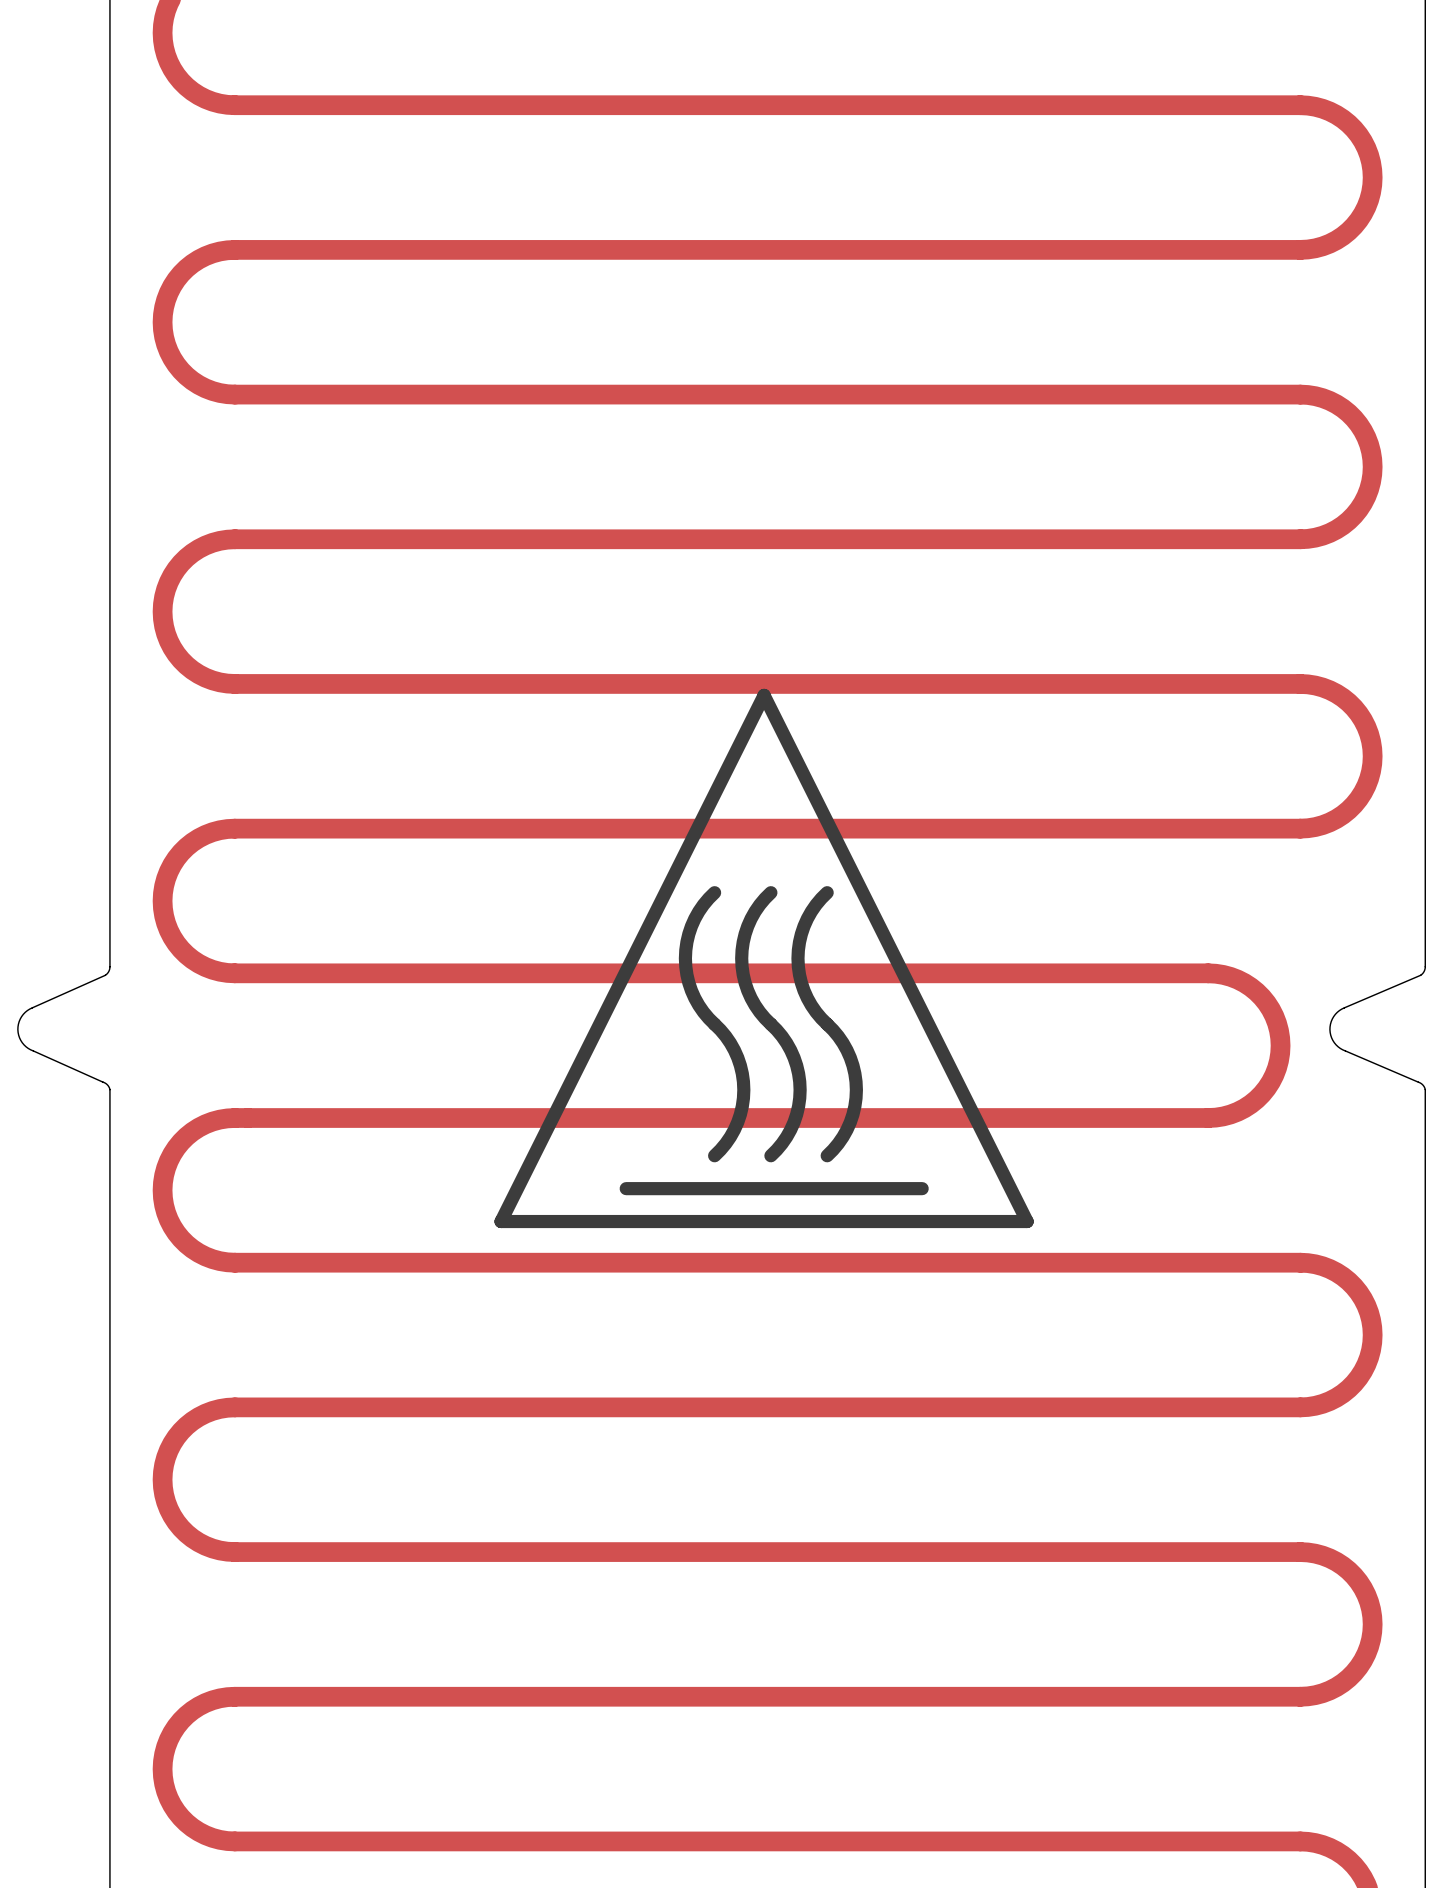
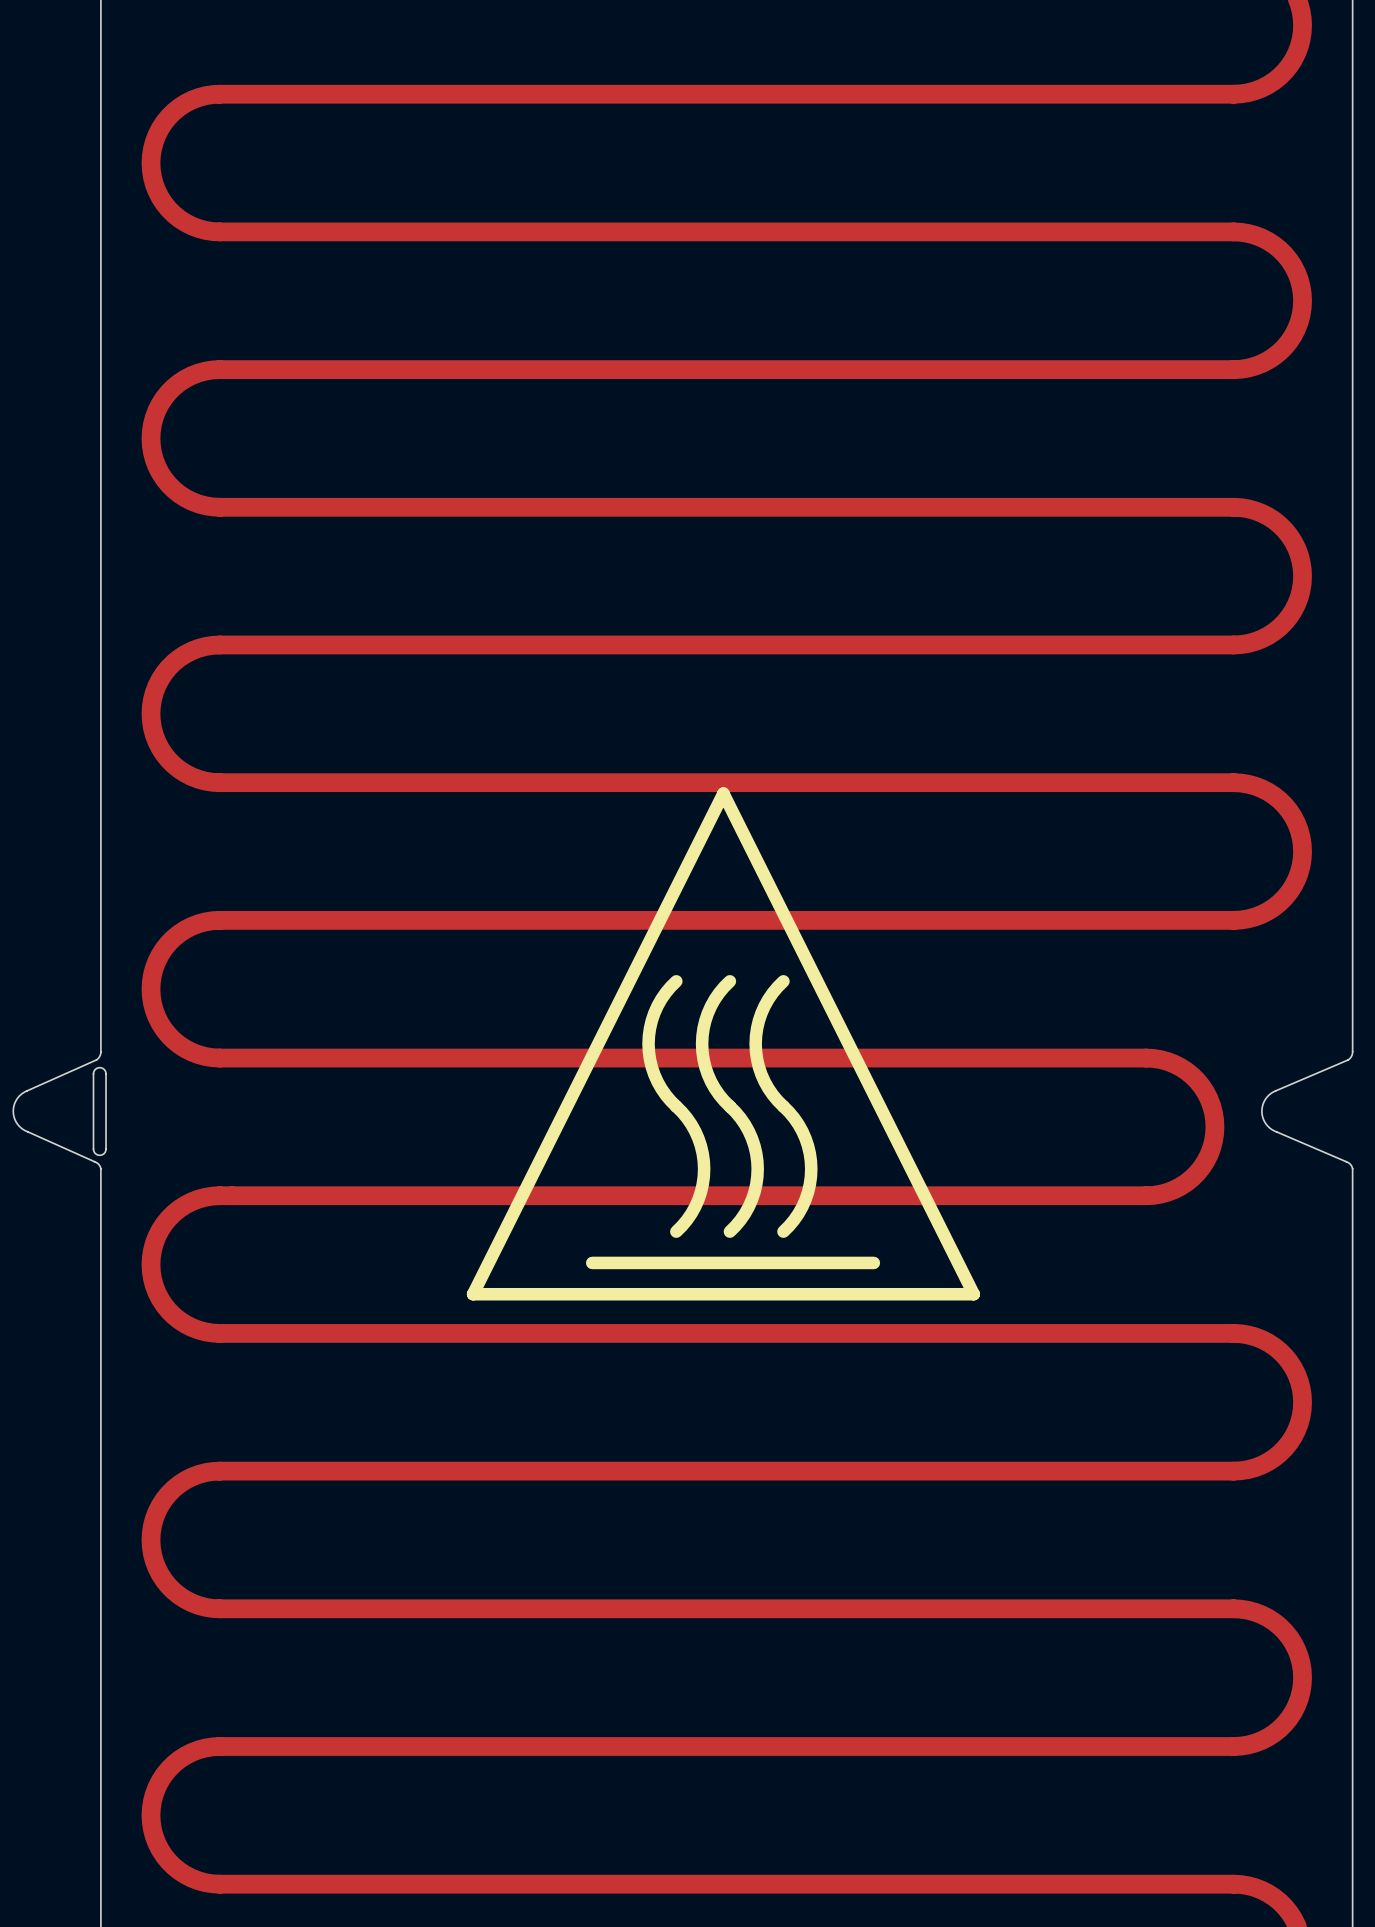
board edge: none -> (93, 1073) (93, 1149) (95, 1153) (100, 1155) (105, 1149) (105, 1073) (103, 1069) (99, 1067) (95, 1069) (93, 1073)

